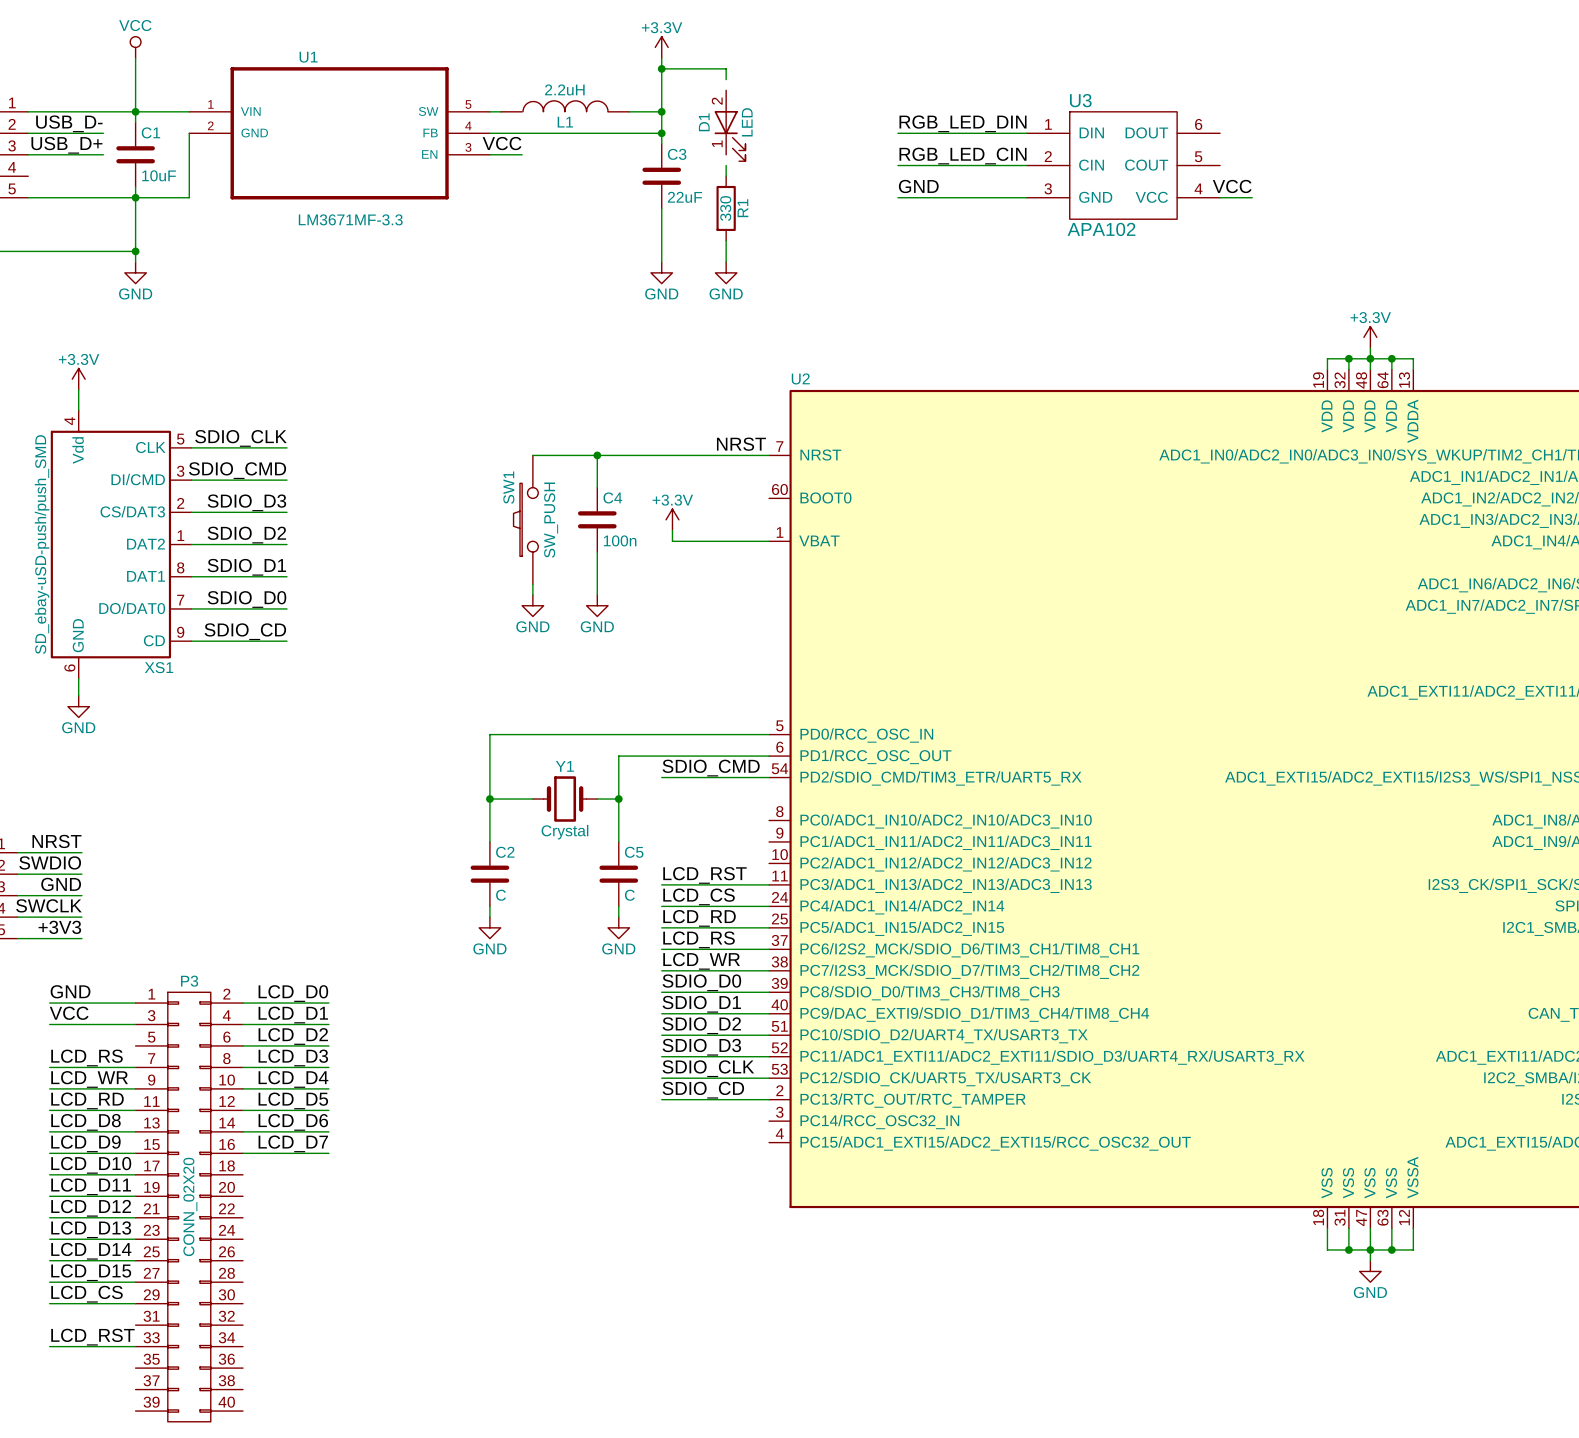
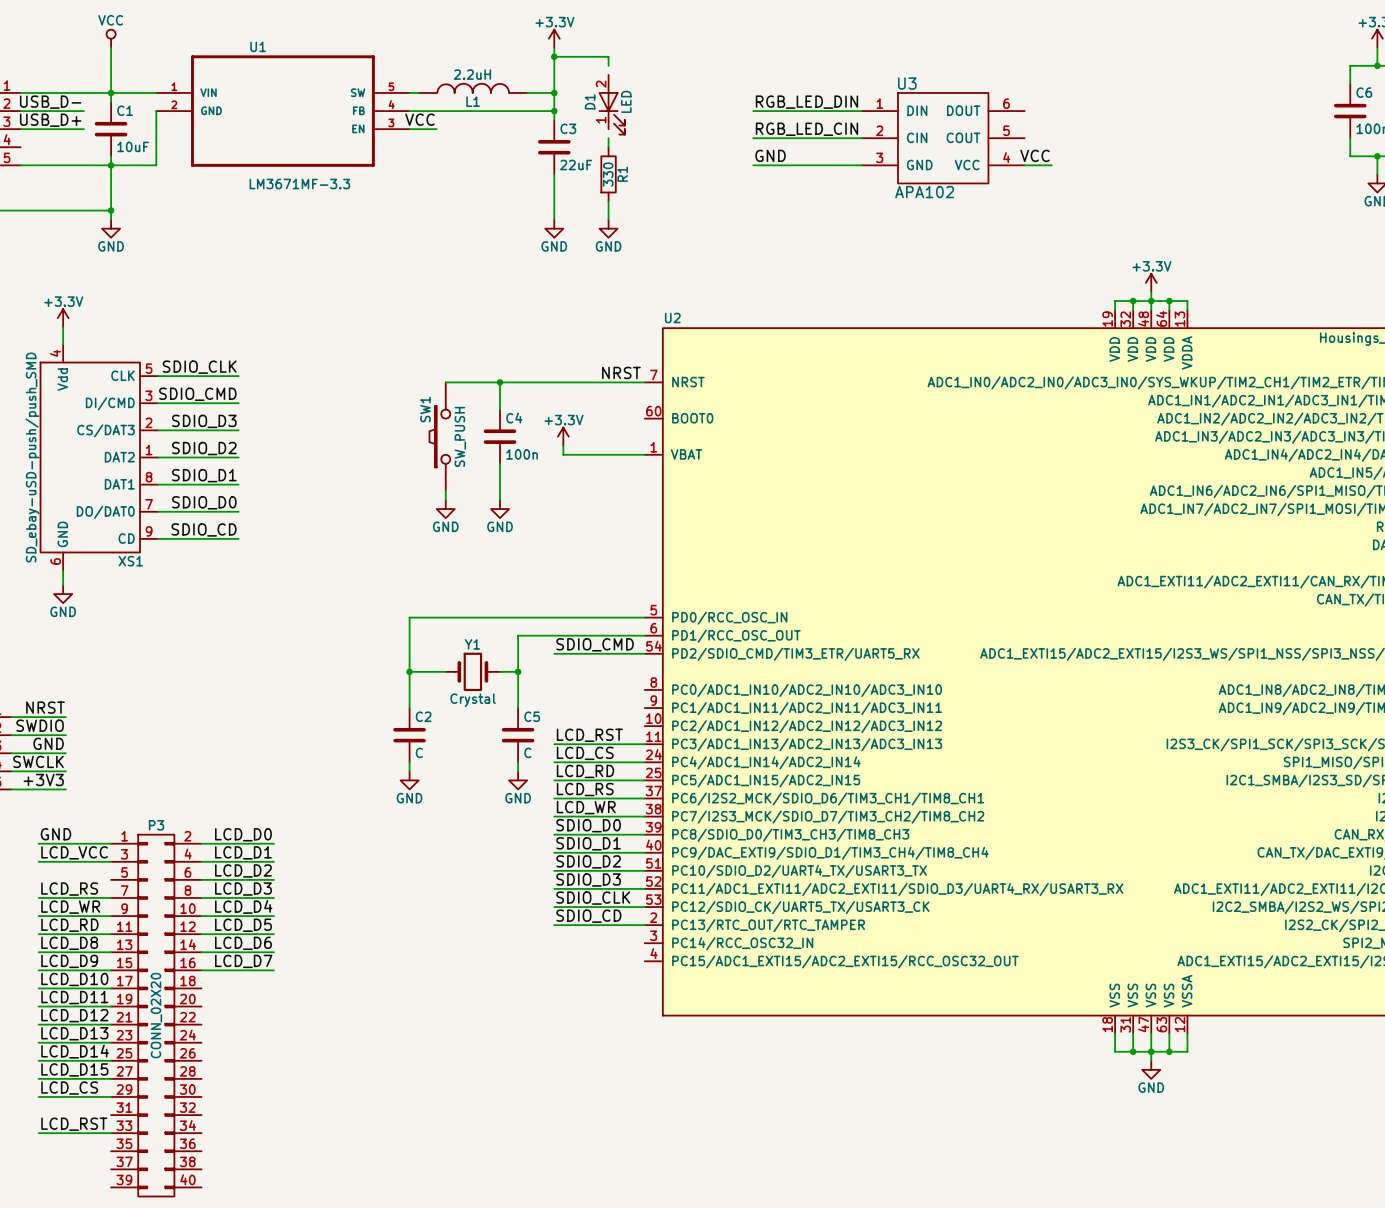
label: VCC (69, 1013) -> LCD_VCC (74, 852)

